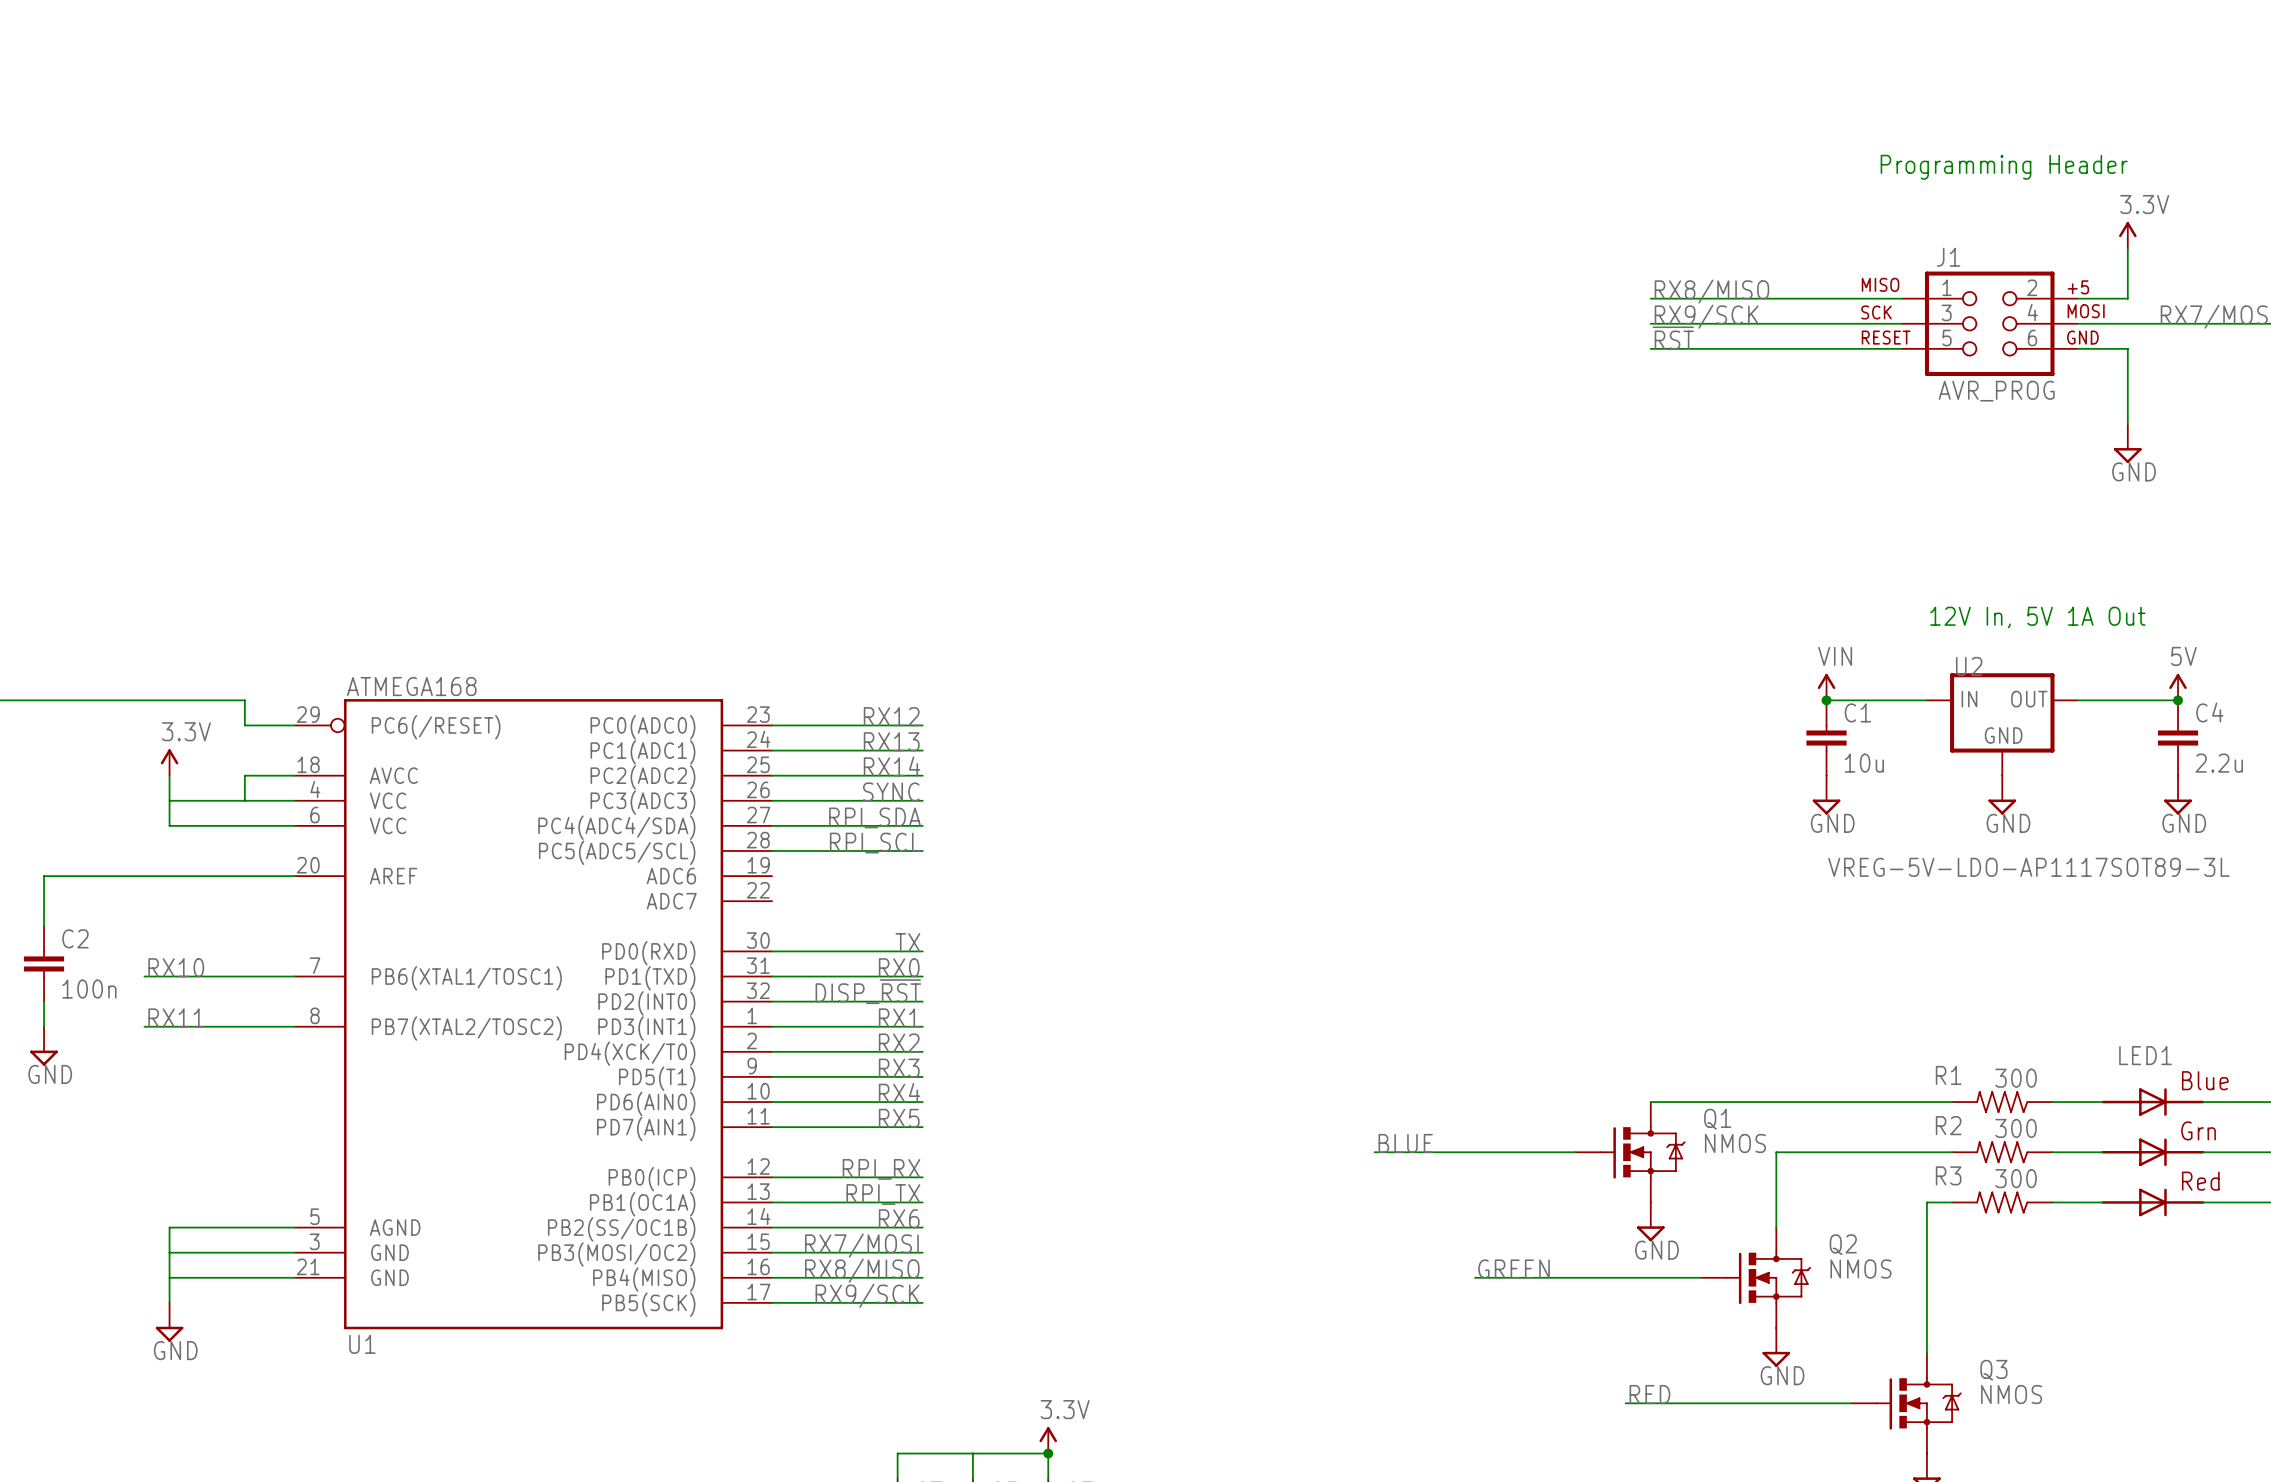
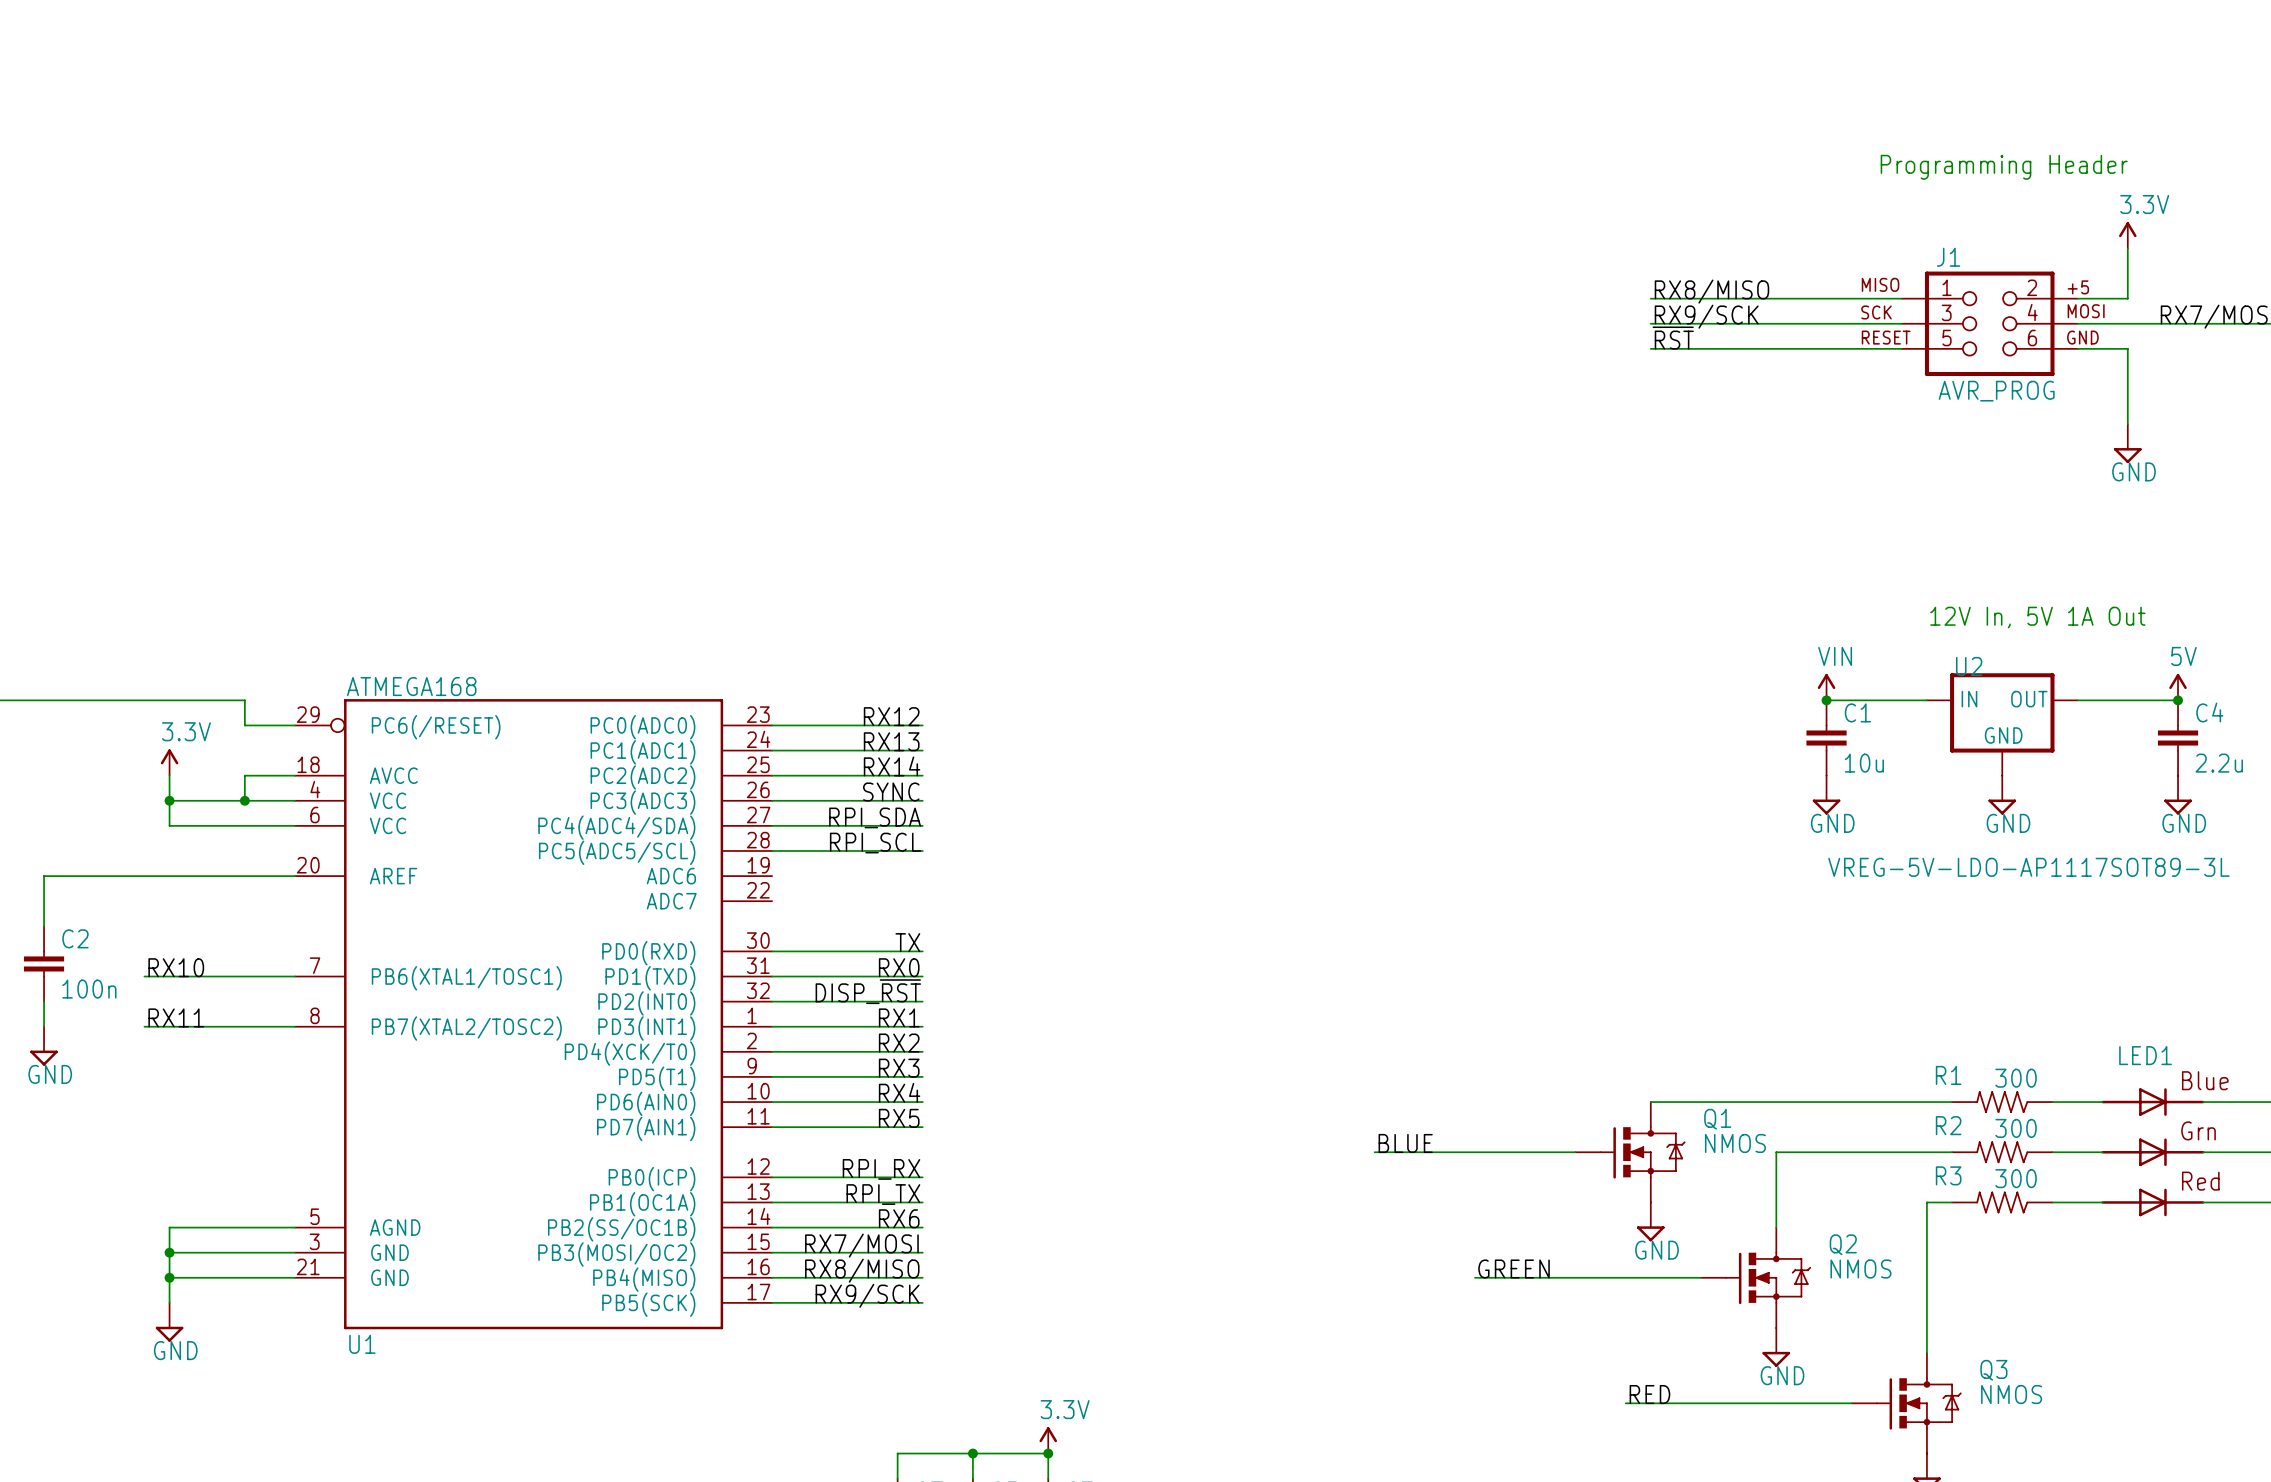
junction: none -> (169, 800)
junction: none -> (244, 800)
junction: none -> (169, 1252)
junction: none -> (169, 1277)
junction: none -> (972, 1453)

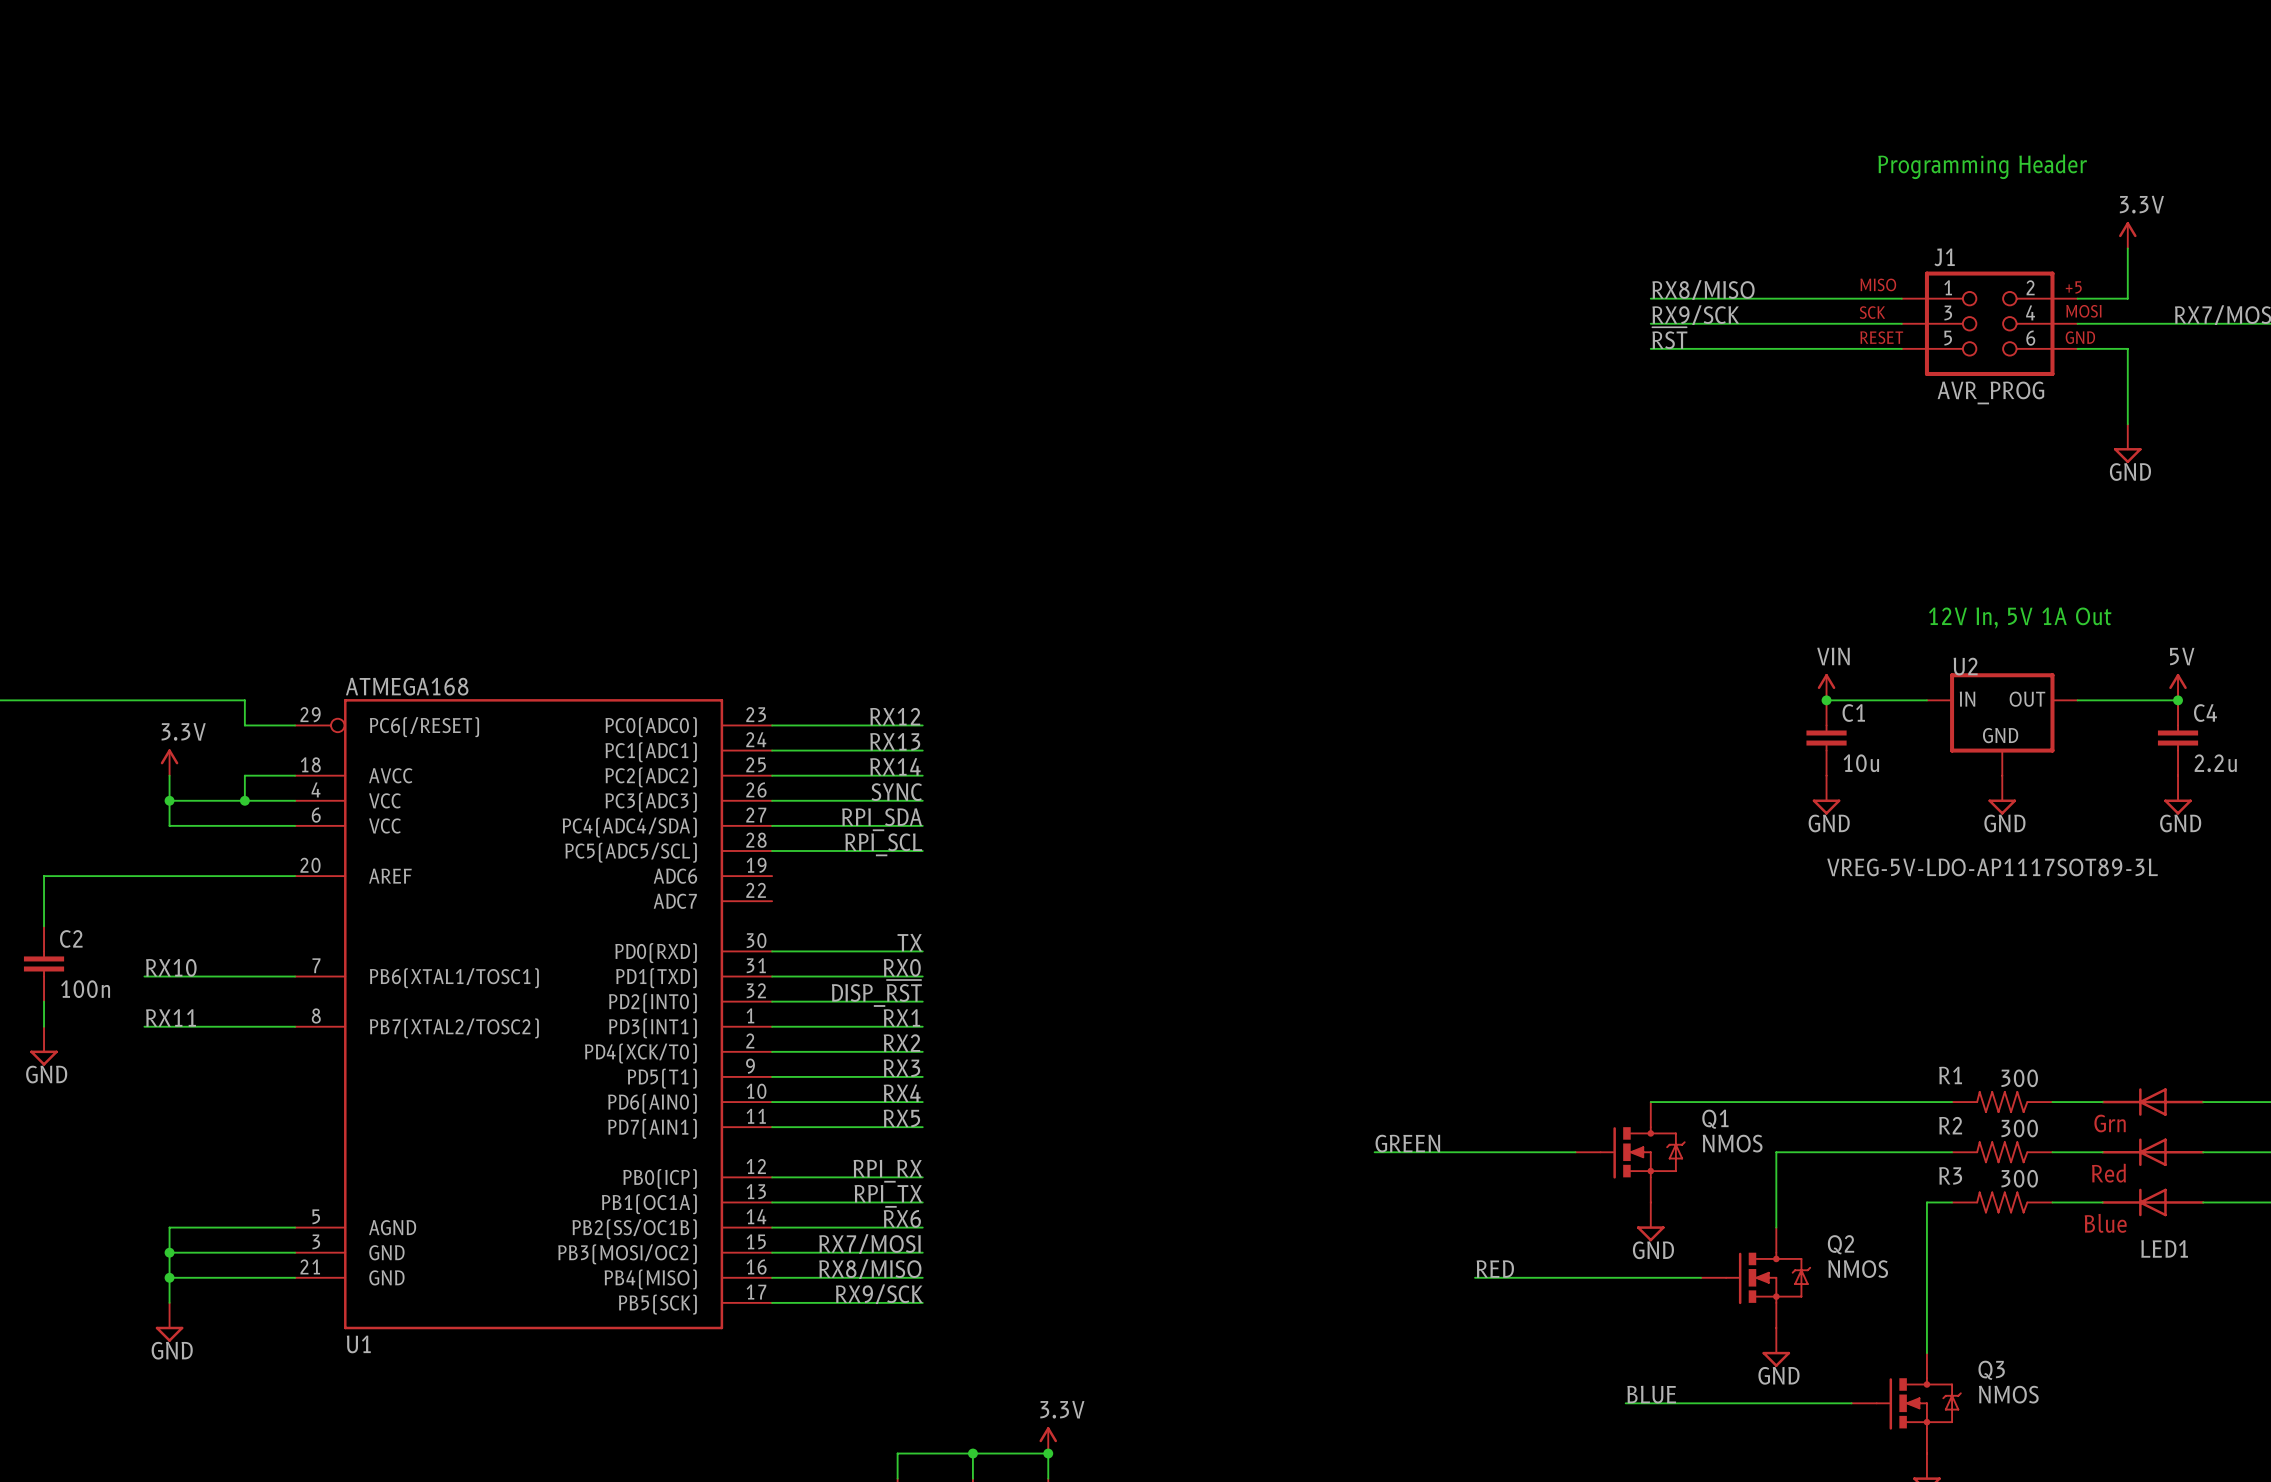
LED1 name position: LED1 (2145, 1055) -> LED1 (2164, 1248)
LED1 symbol: [2101, 1088, 2205, 1217] -> [2101, 1088, 2205, 1217]
label: BLUE (1405, 1143) -> GREEN (1407, 1143)
label: GREEN (1514, 1269) -> RED (1495, 1269)
label: RED (1649, 1394) -> BLUE (1651, 1394)

